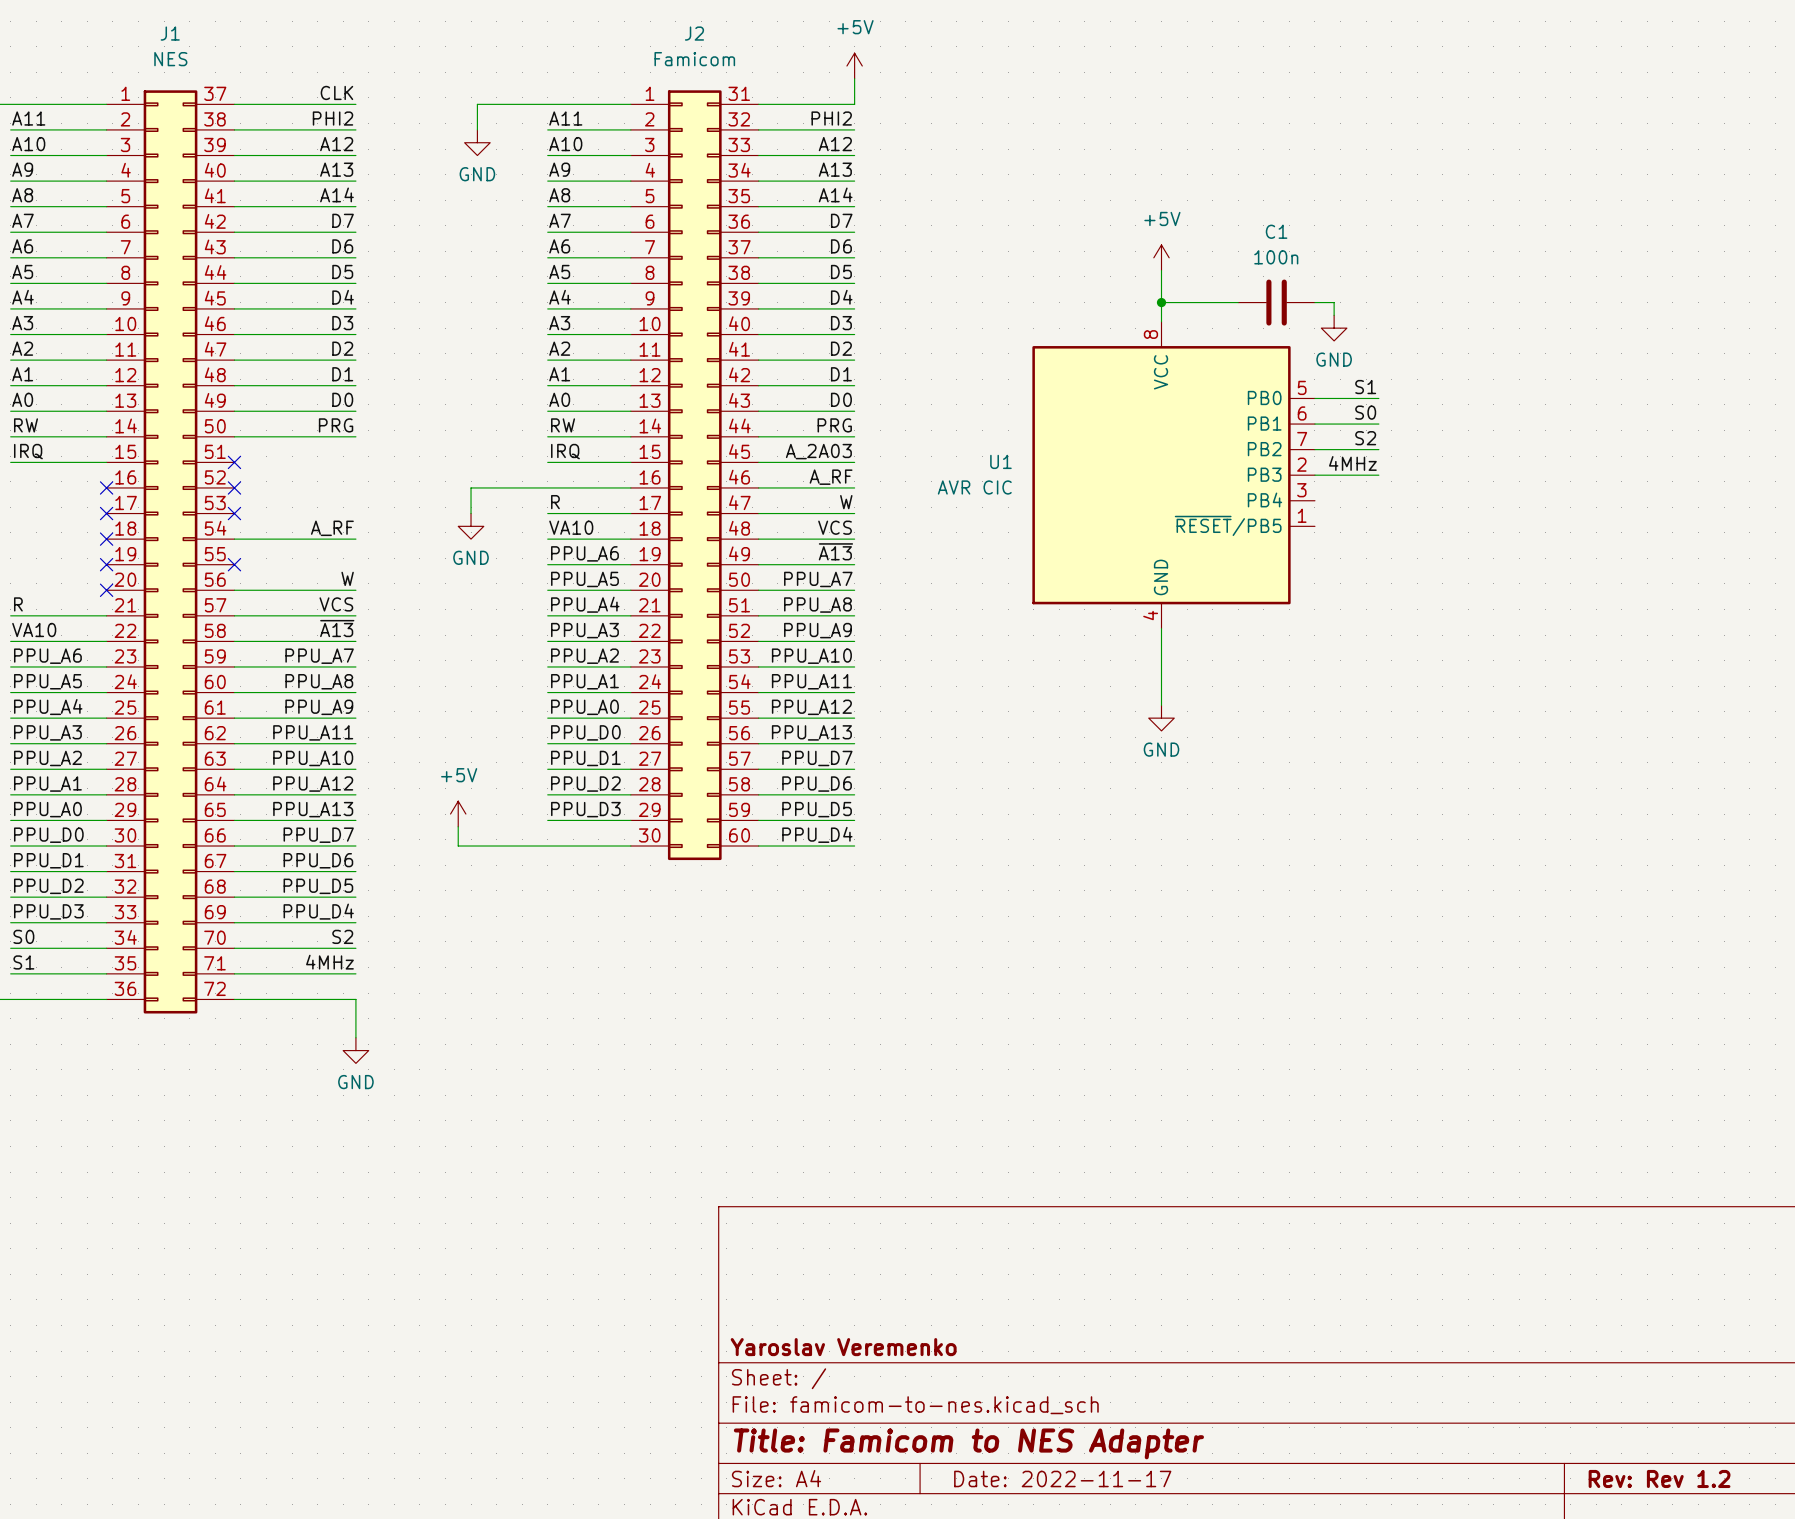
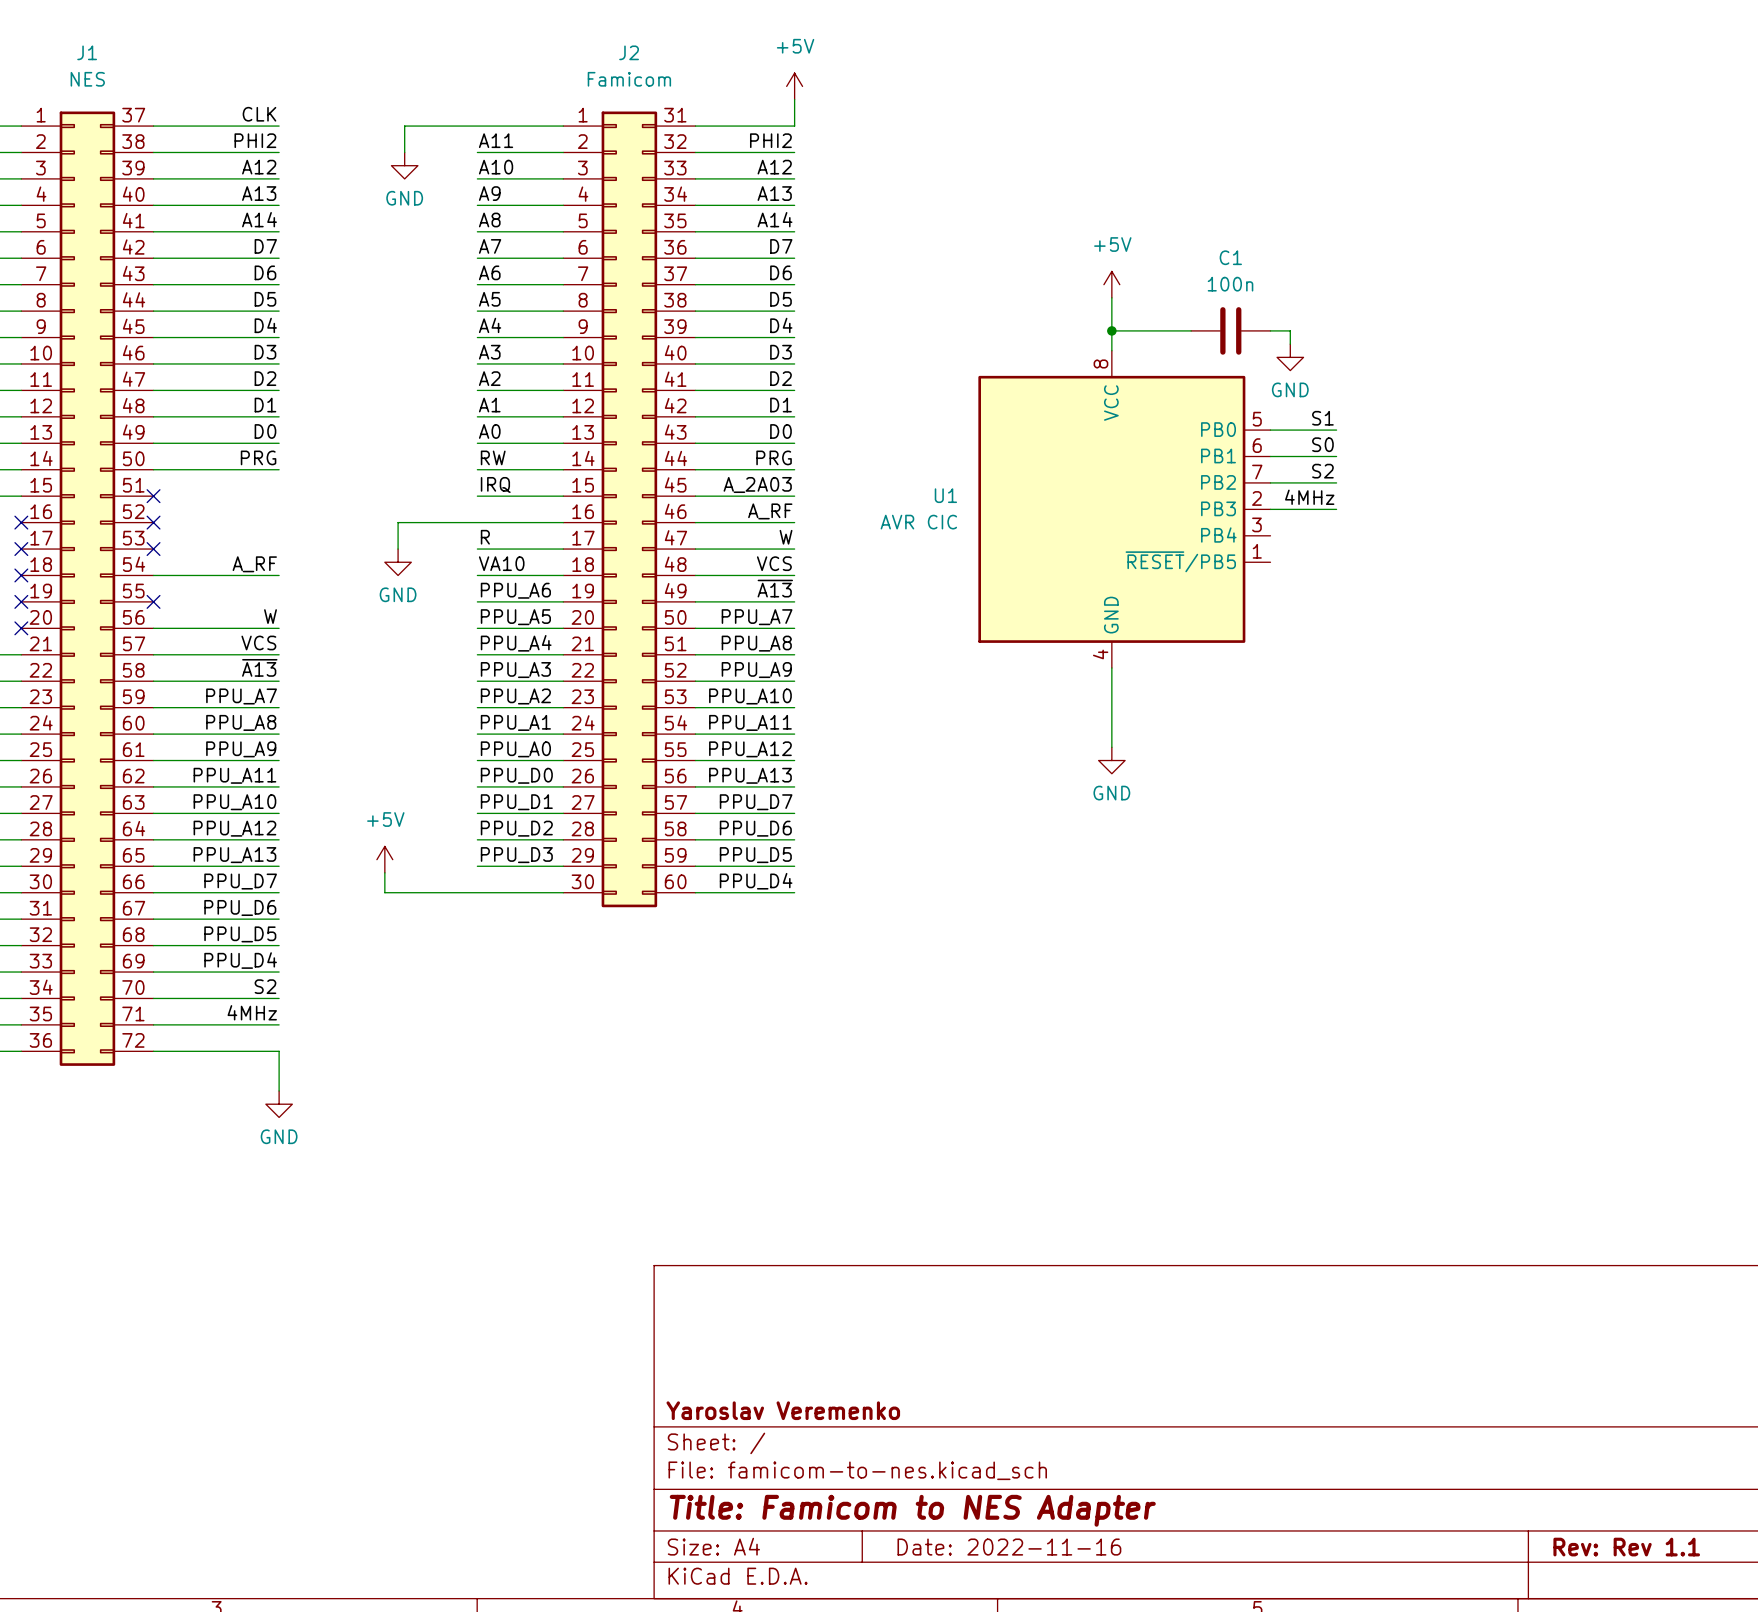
title block: Date: 2022-11-17 (1062, 1478) -> Date: 2022-11-16 (1009, 1547)
title block: Rev: Rev 1.2 (1659, 1478) -> Rev: Rev 1.1 (1626, 1547)

